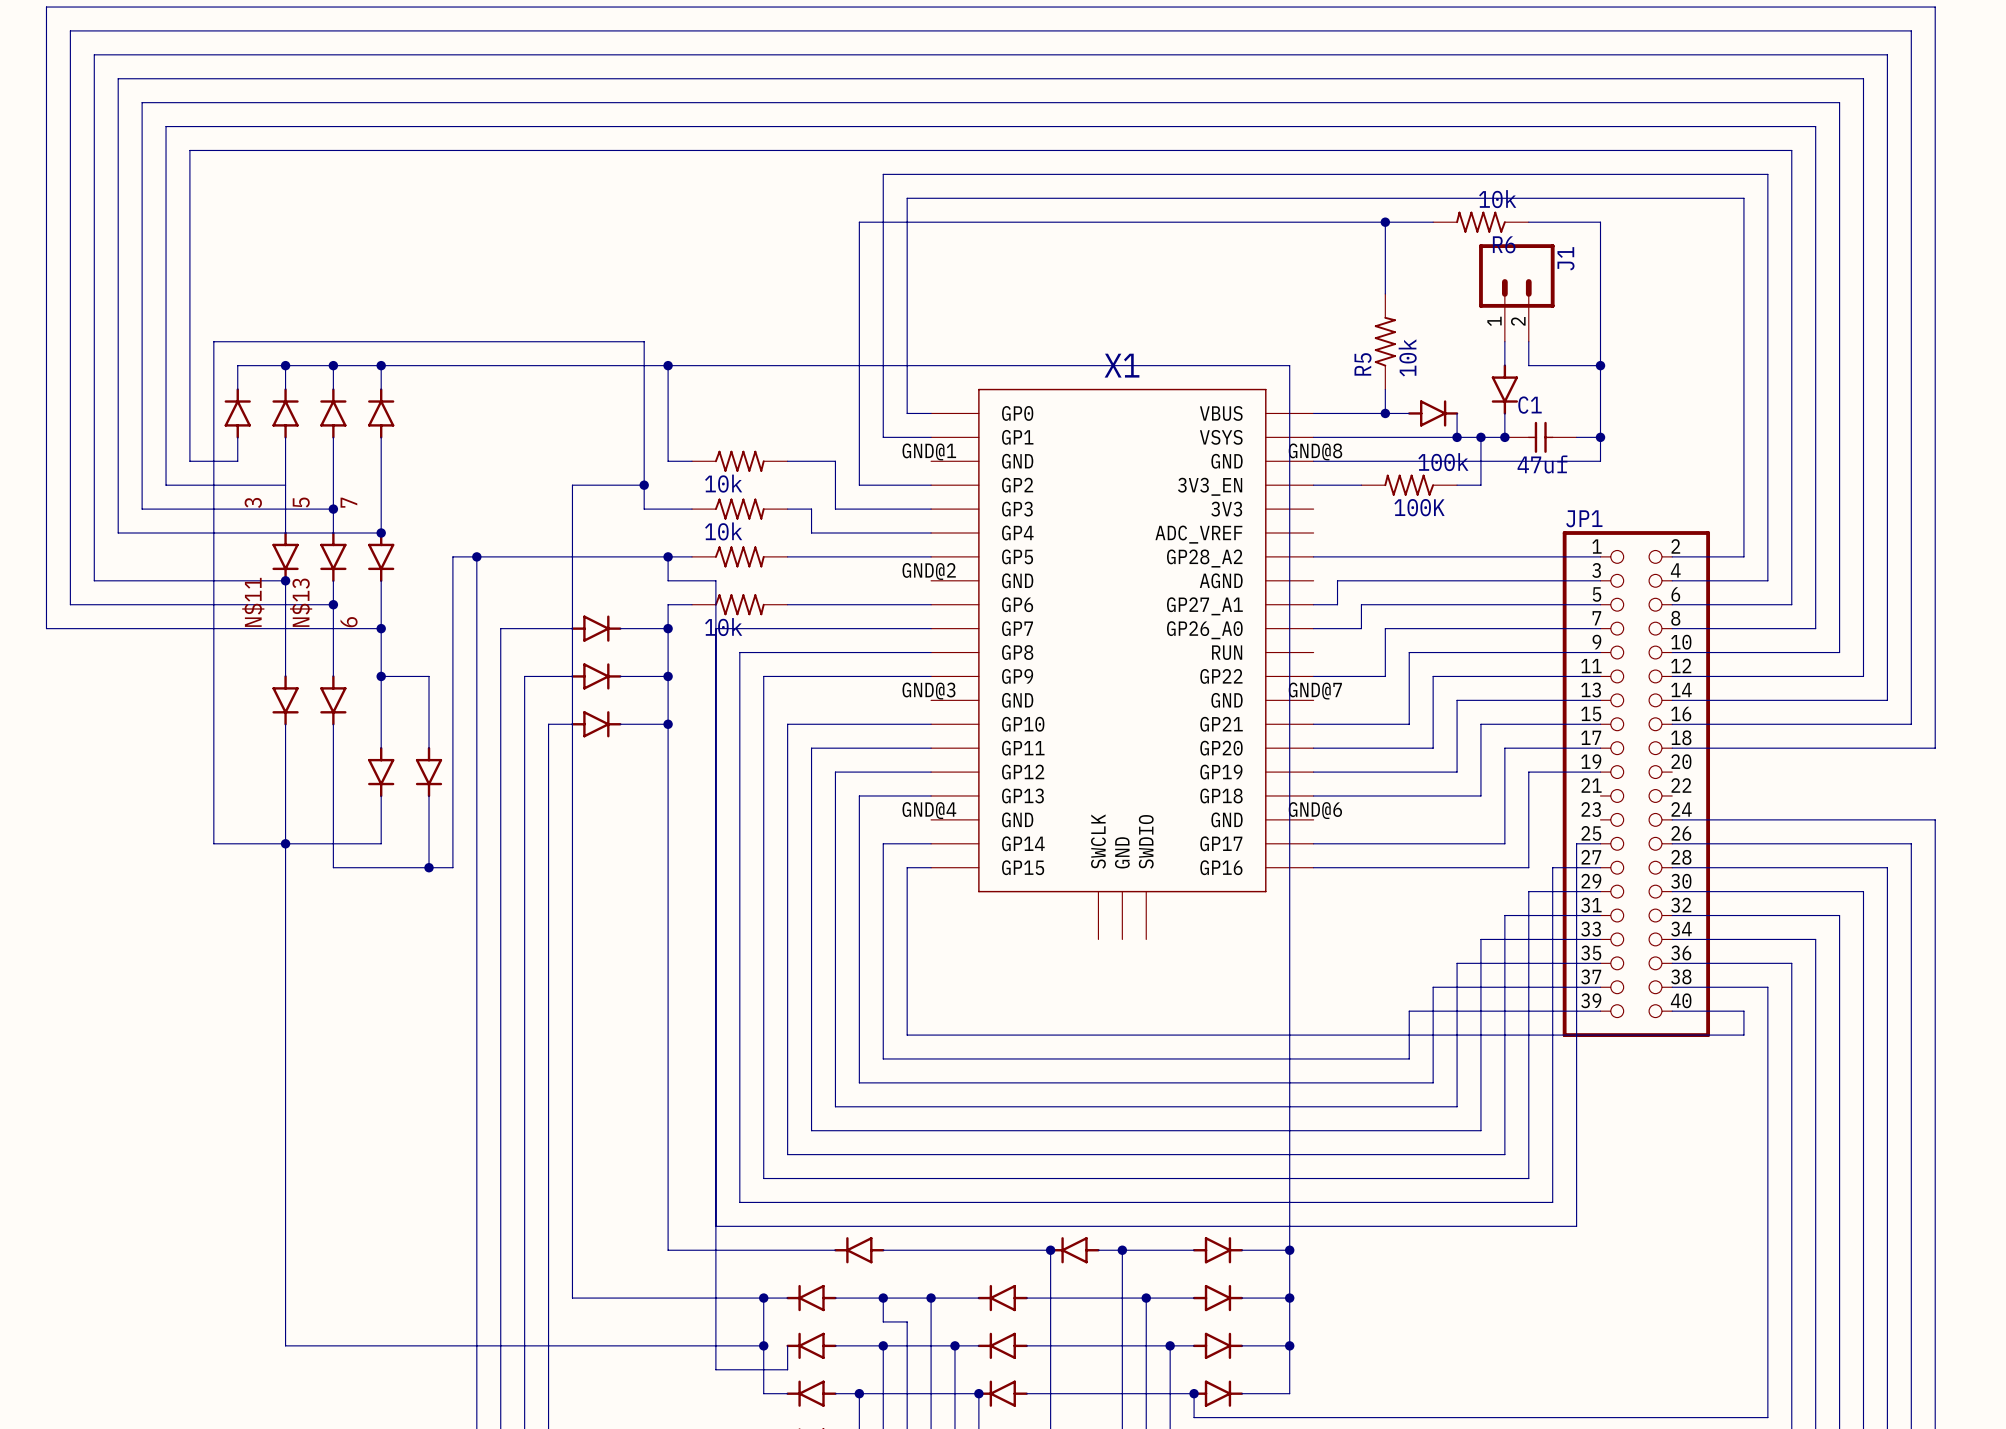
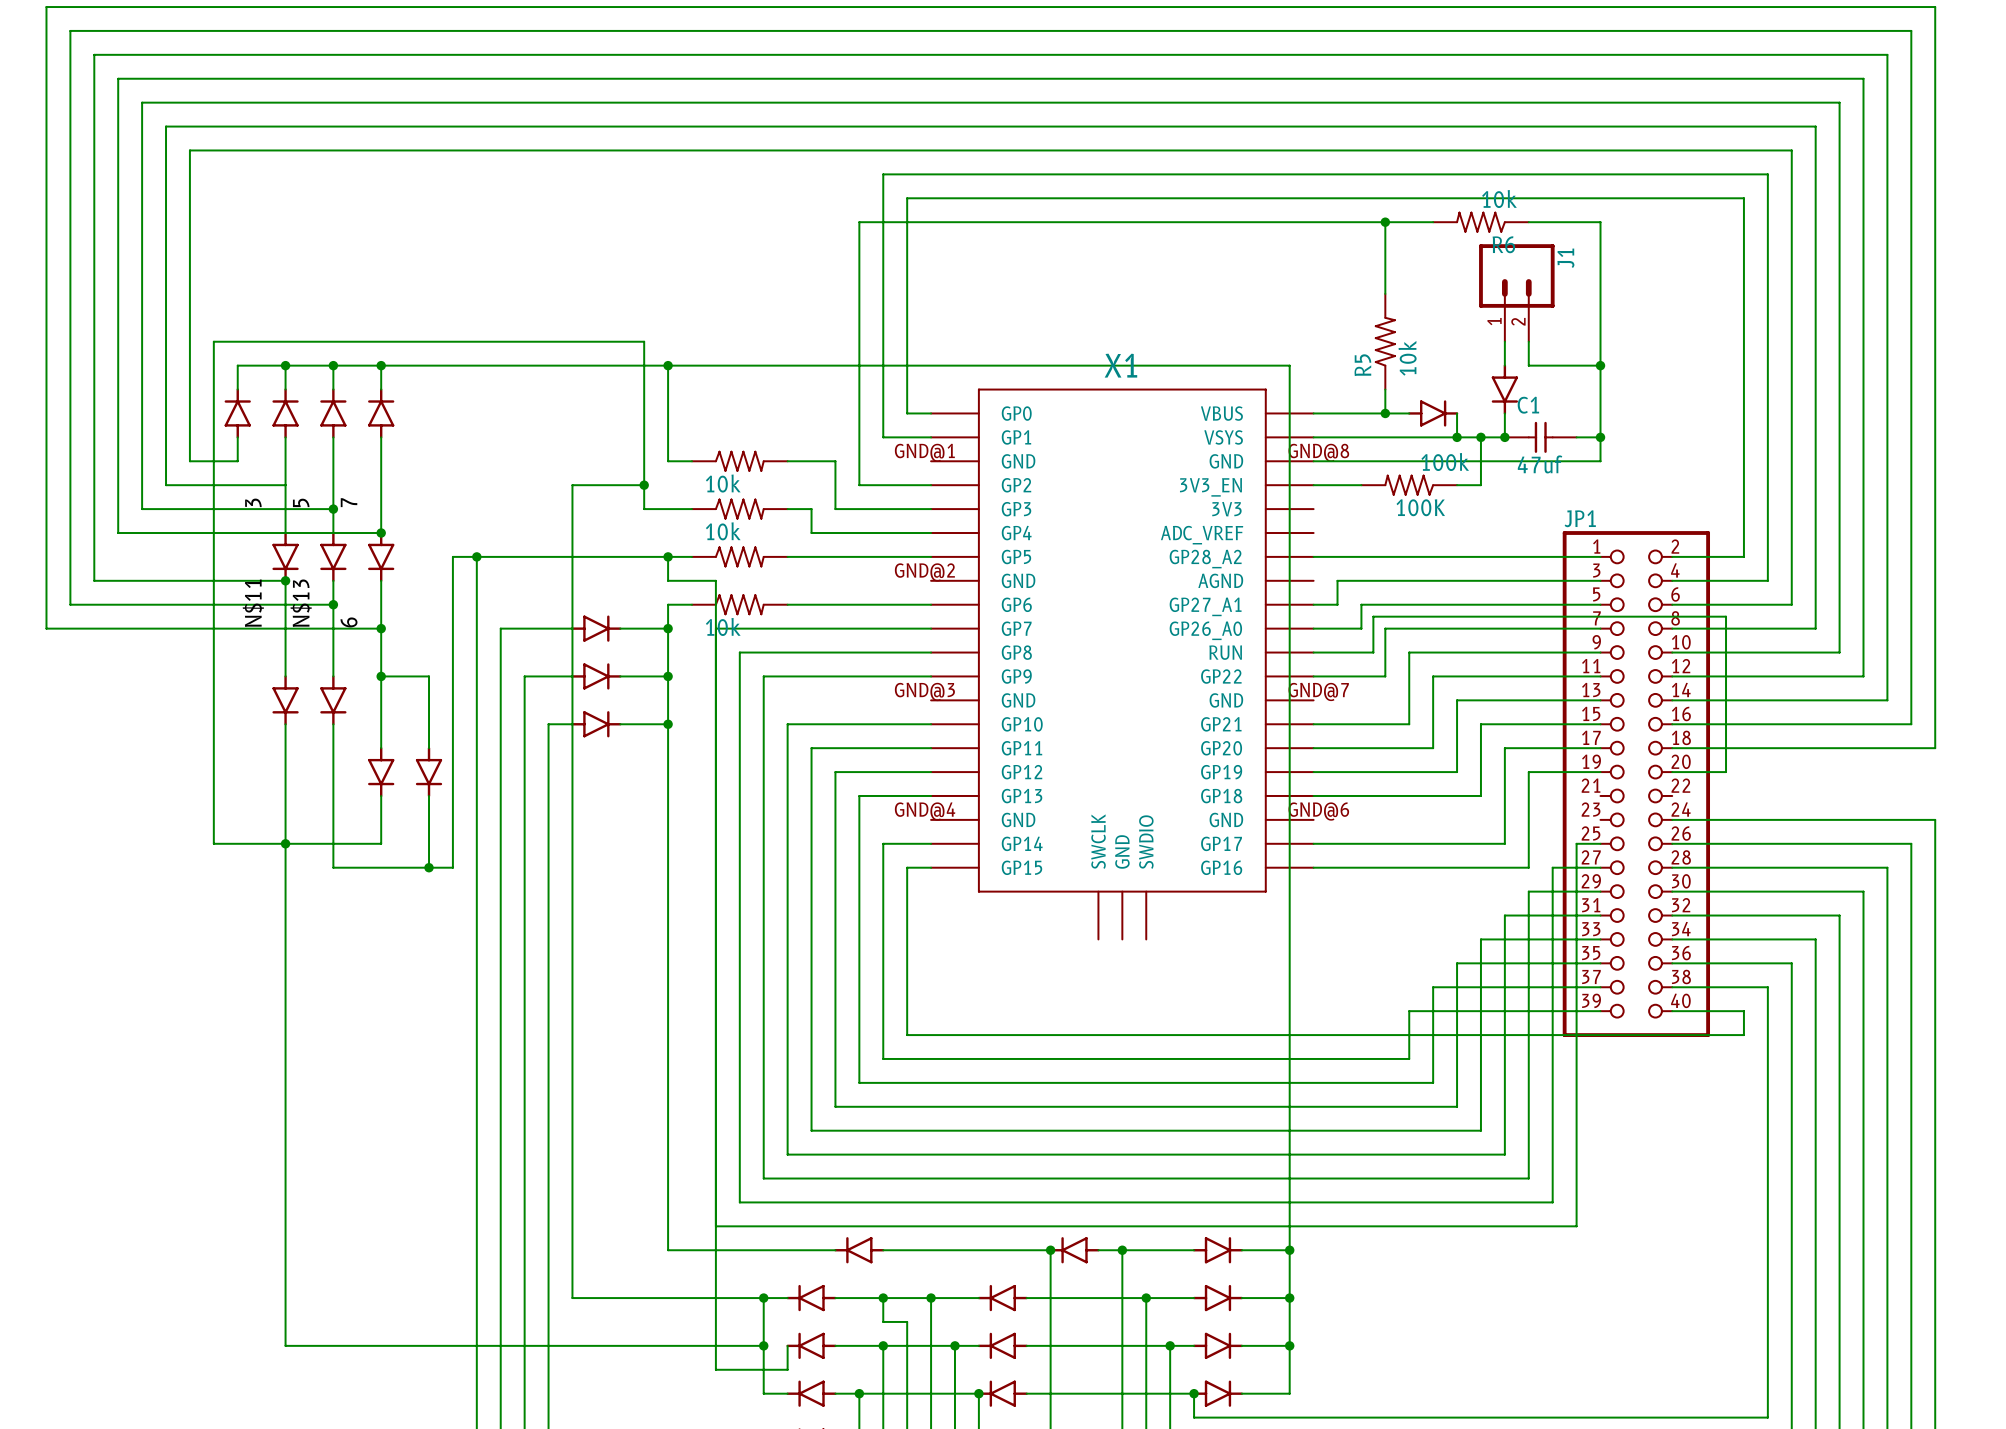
wire: none -> (1313, 652) (1373, 652) (1373, 616) (1726, 616) (1726, 772) (1672, 772)

